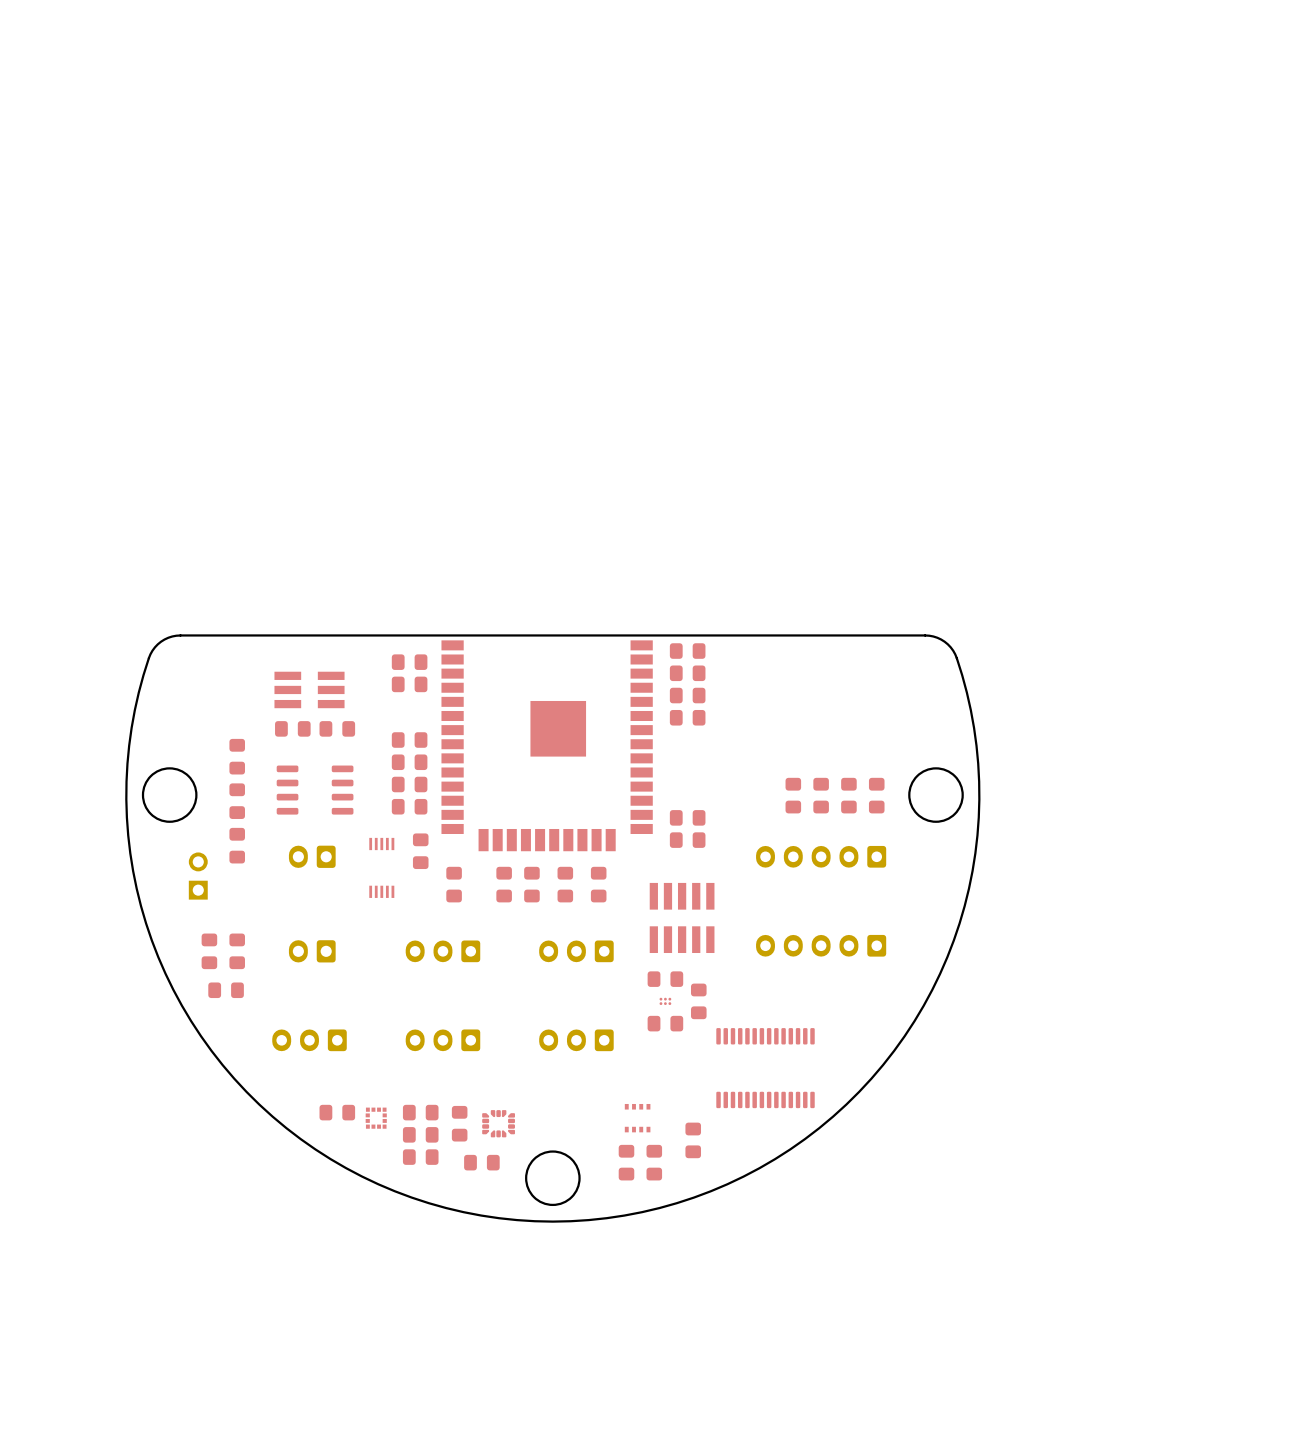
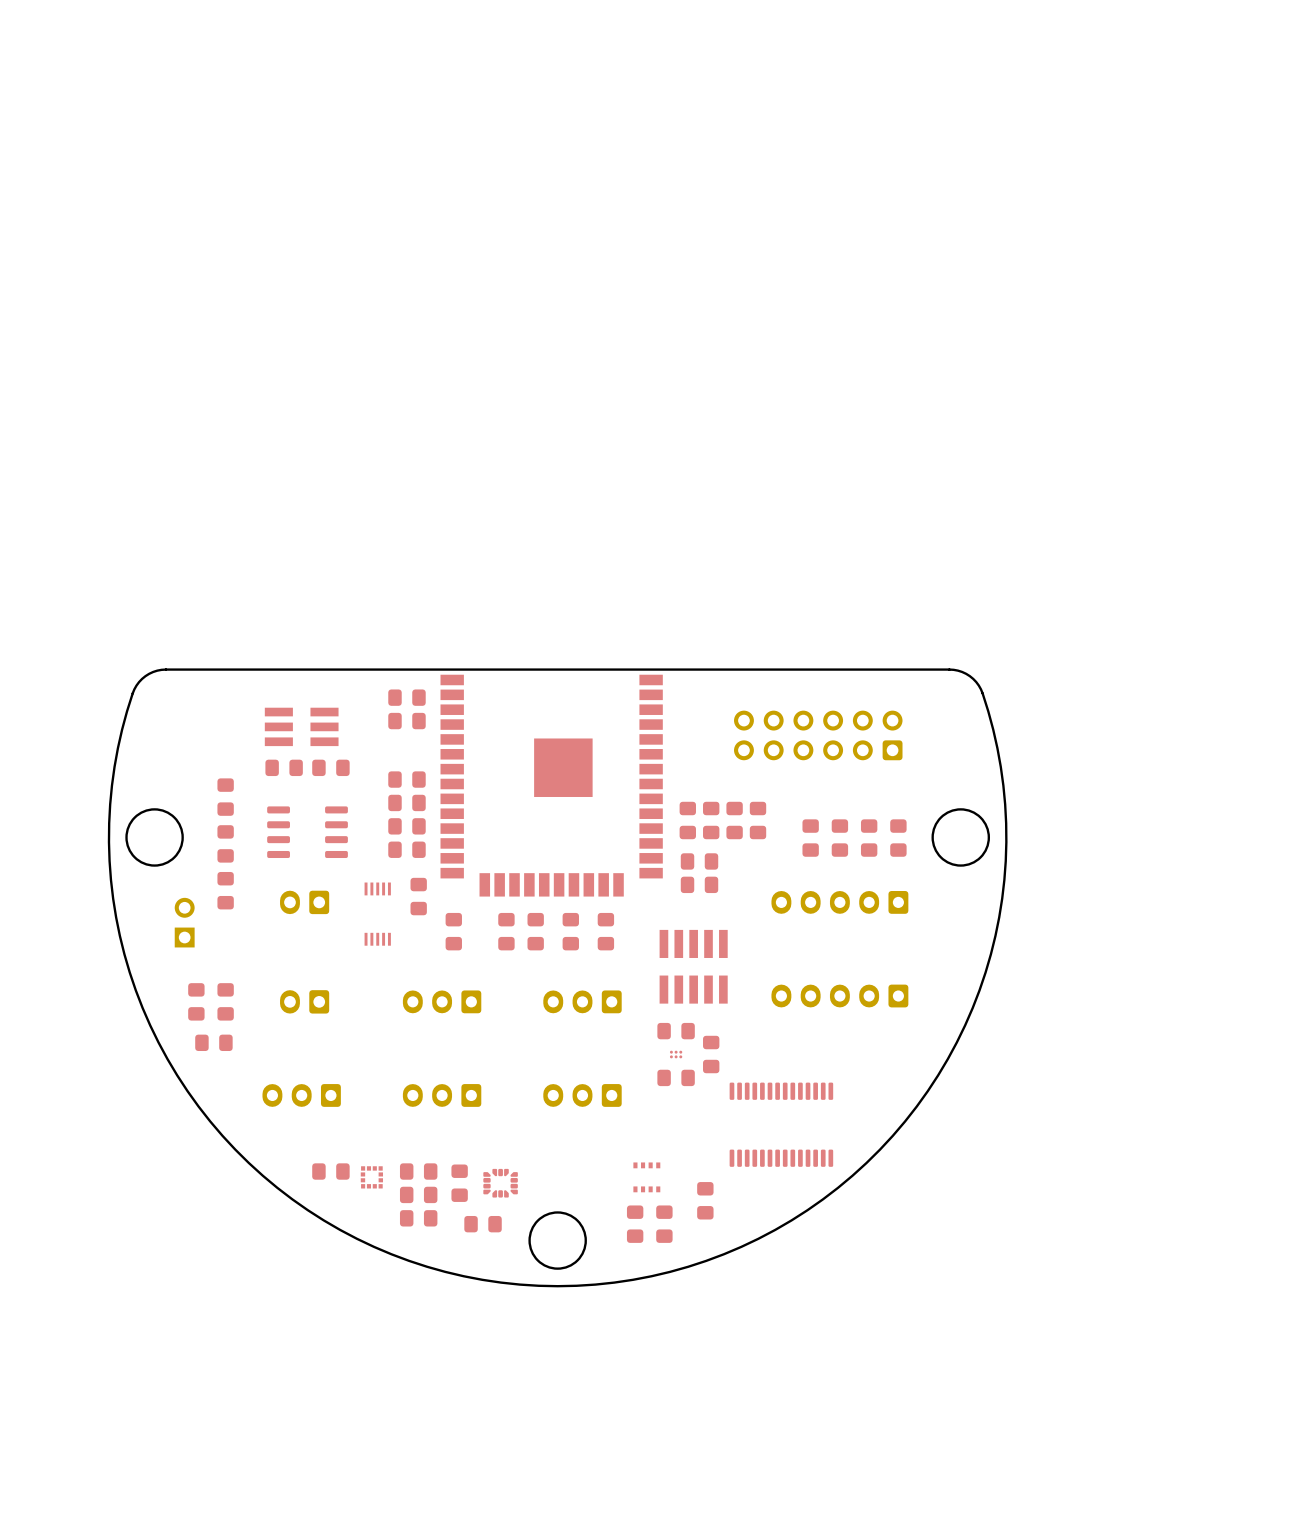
part: (687, 651) -> none
part: (687, 673) -> none
part: (687, 695) -> none
part: none -> (818, 735)
part: (687, 717) -> none
part: none -> (687, 820)
part: none -> (711, 820)
part: none -> (734, 820)
part: none -> (758, 820)

